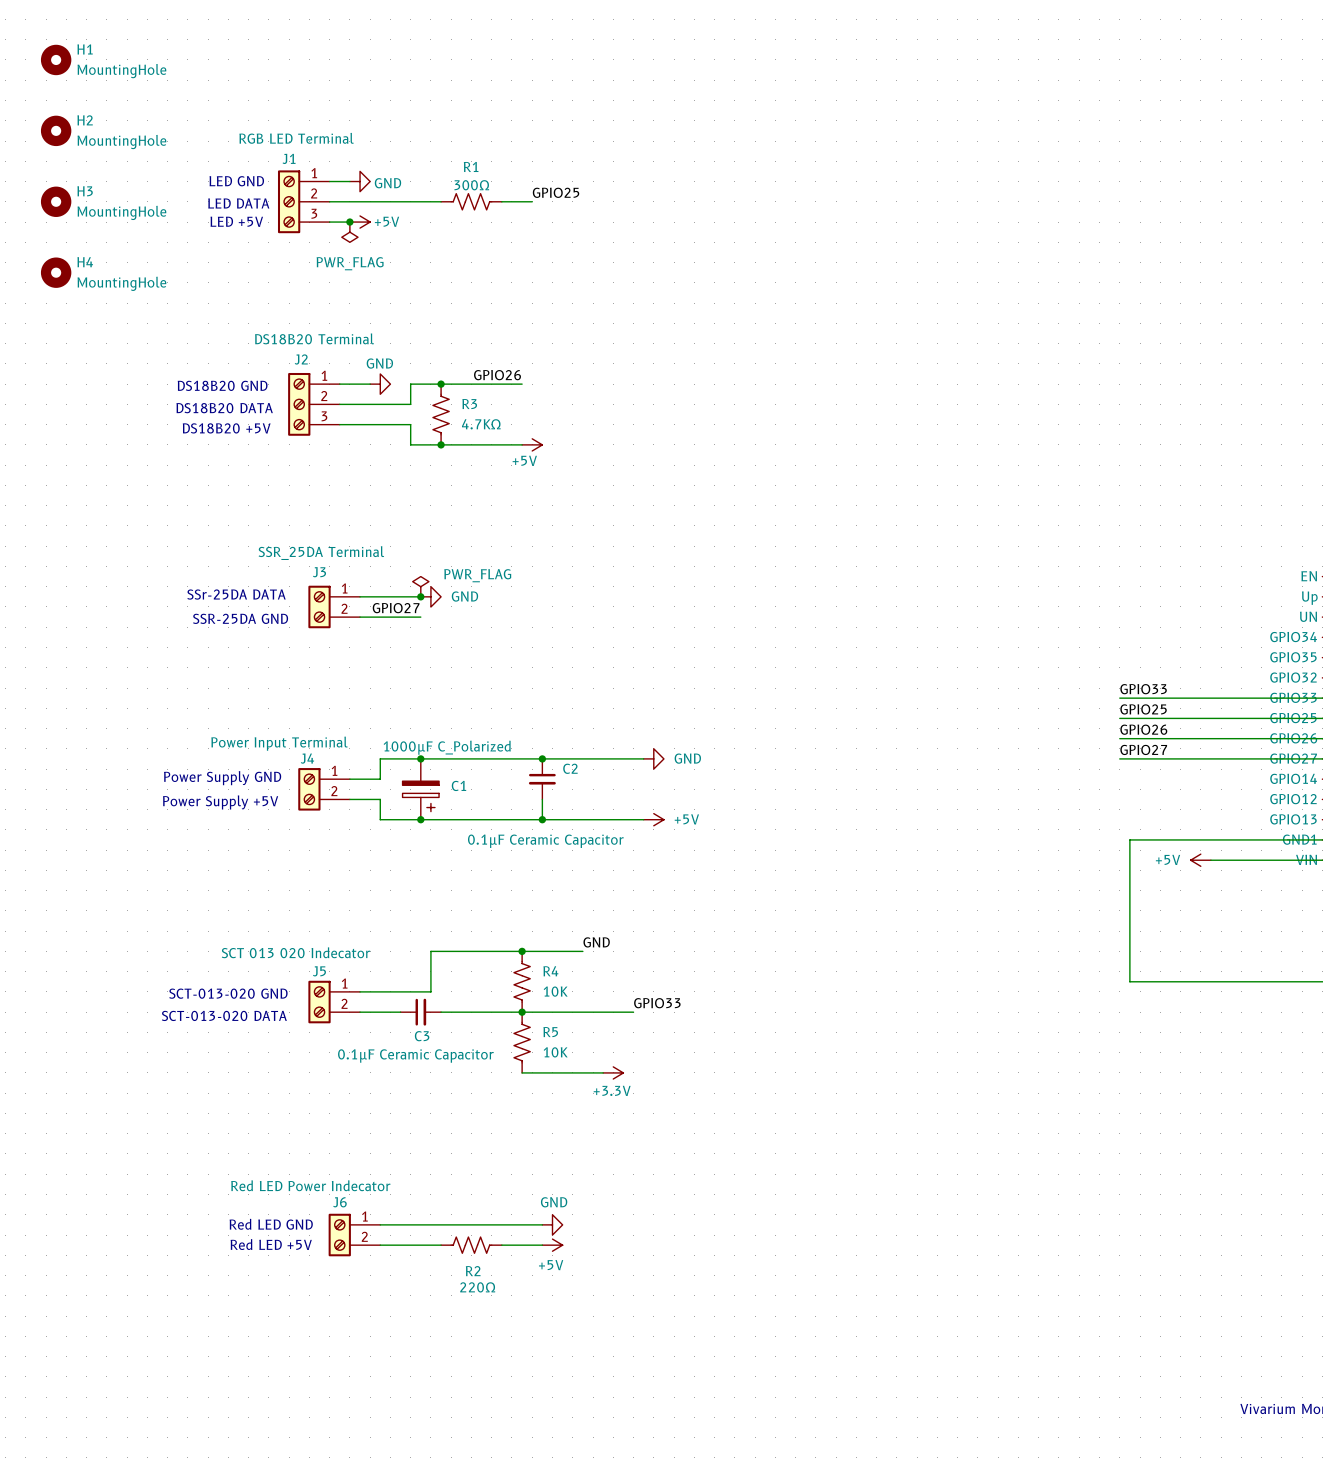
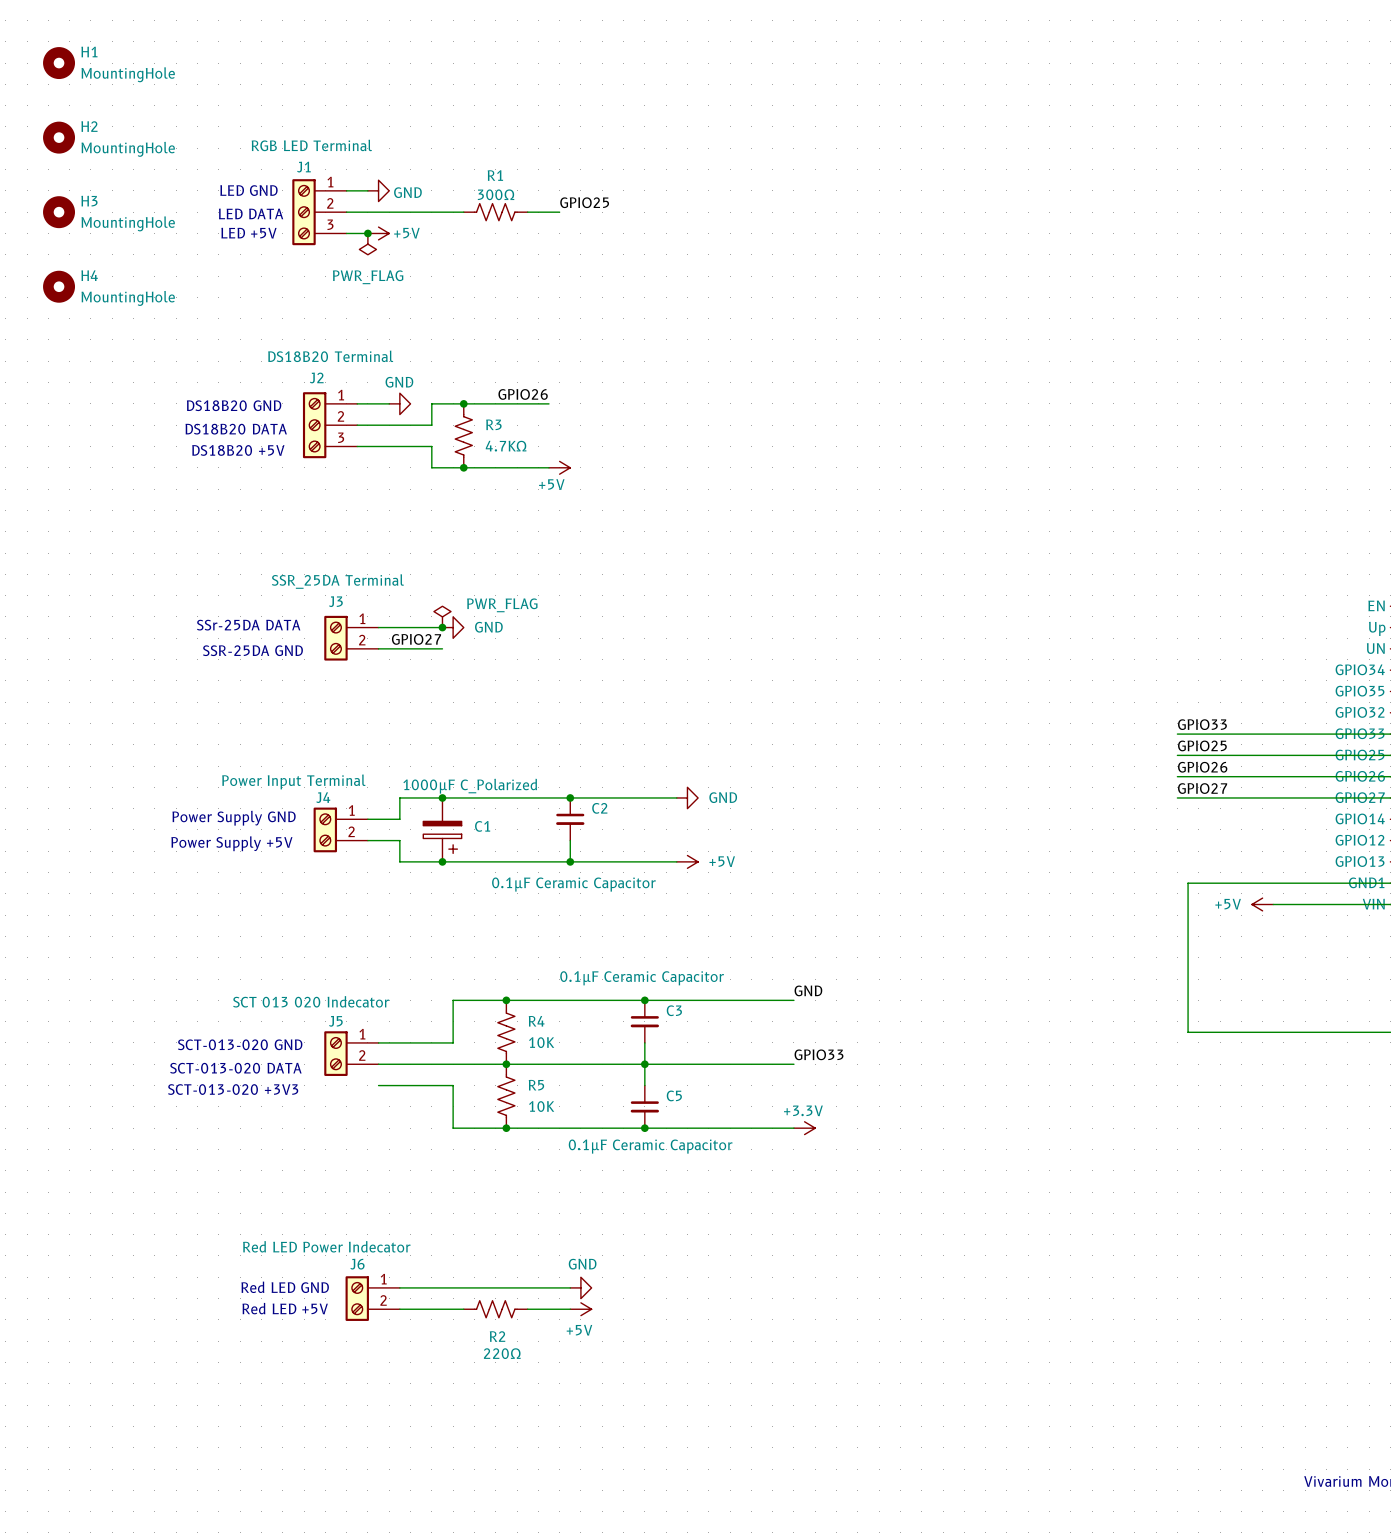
label position: GND (596, 942) -> GND (808, 990)
junction: none -> (506, 1000)
junction: (522, 951) -> none
wire: none -> (612, 1000) (793, 1000)
junction: none -> (644, 1000)
R4 position: (522, 981) -> (506, 1032)
wire: none -> (644, 1042) (644, 1085)
label position: GPIO33 (657, 1003) -> GPIO33 (818, 1054)
C3 rotation: 0° (420, 1012) -> 90° clockwise (644, 1021)
C3 position: (420, 1012) -> (644, 1021)
junction: none -> (506, 1064)
junction: (522, 1012) -> none
junction: none -> (644, 1064)
wire: none -> (666, 1064) (793, 1064)
wire: none -> (378, 1085) (453, 1085) (453, 1128) (548, 1128)
text: none -> SCT-013-020 +3V3 (233, 1089)
C3 name position: C3 (422, 1036) -> C3 (674, 1010)
R5 position: (522, 1042) -> (506, 1096)
C5: none -> 0.1µF Ceramic Capacitor (644, 1106)
C3 value position: 0.1µF Ceramic Capacitor (415, 1056) -> 0.1µF Ceramic Capacitor (642, 978)
junction: none -> (506, 1128)
wire: none -> (634, 1128) (793, 1128)
junction: none -> (644, 1128)
power symbol position: +3.3V (613, 1072) -> +3.3V (804, 1128)
power symbol text position: +3.3V (612, 1090) -> +3.3V (803, 1110)

